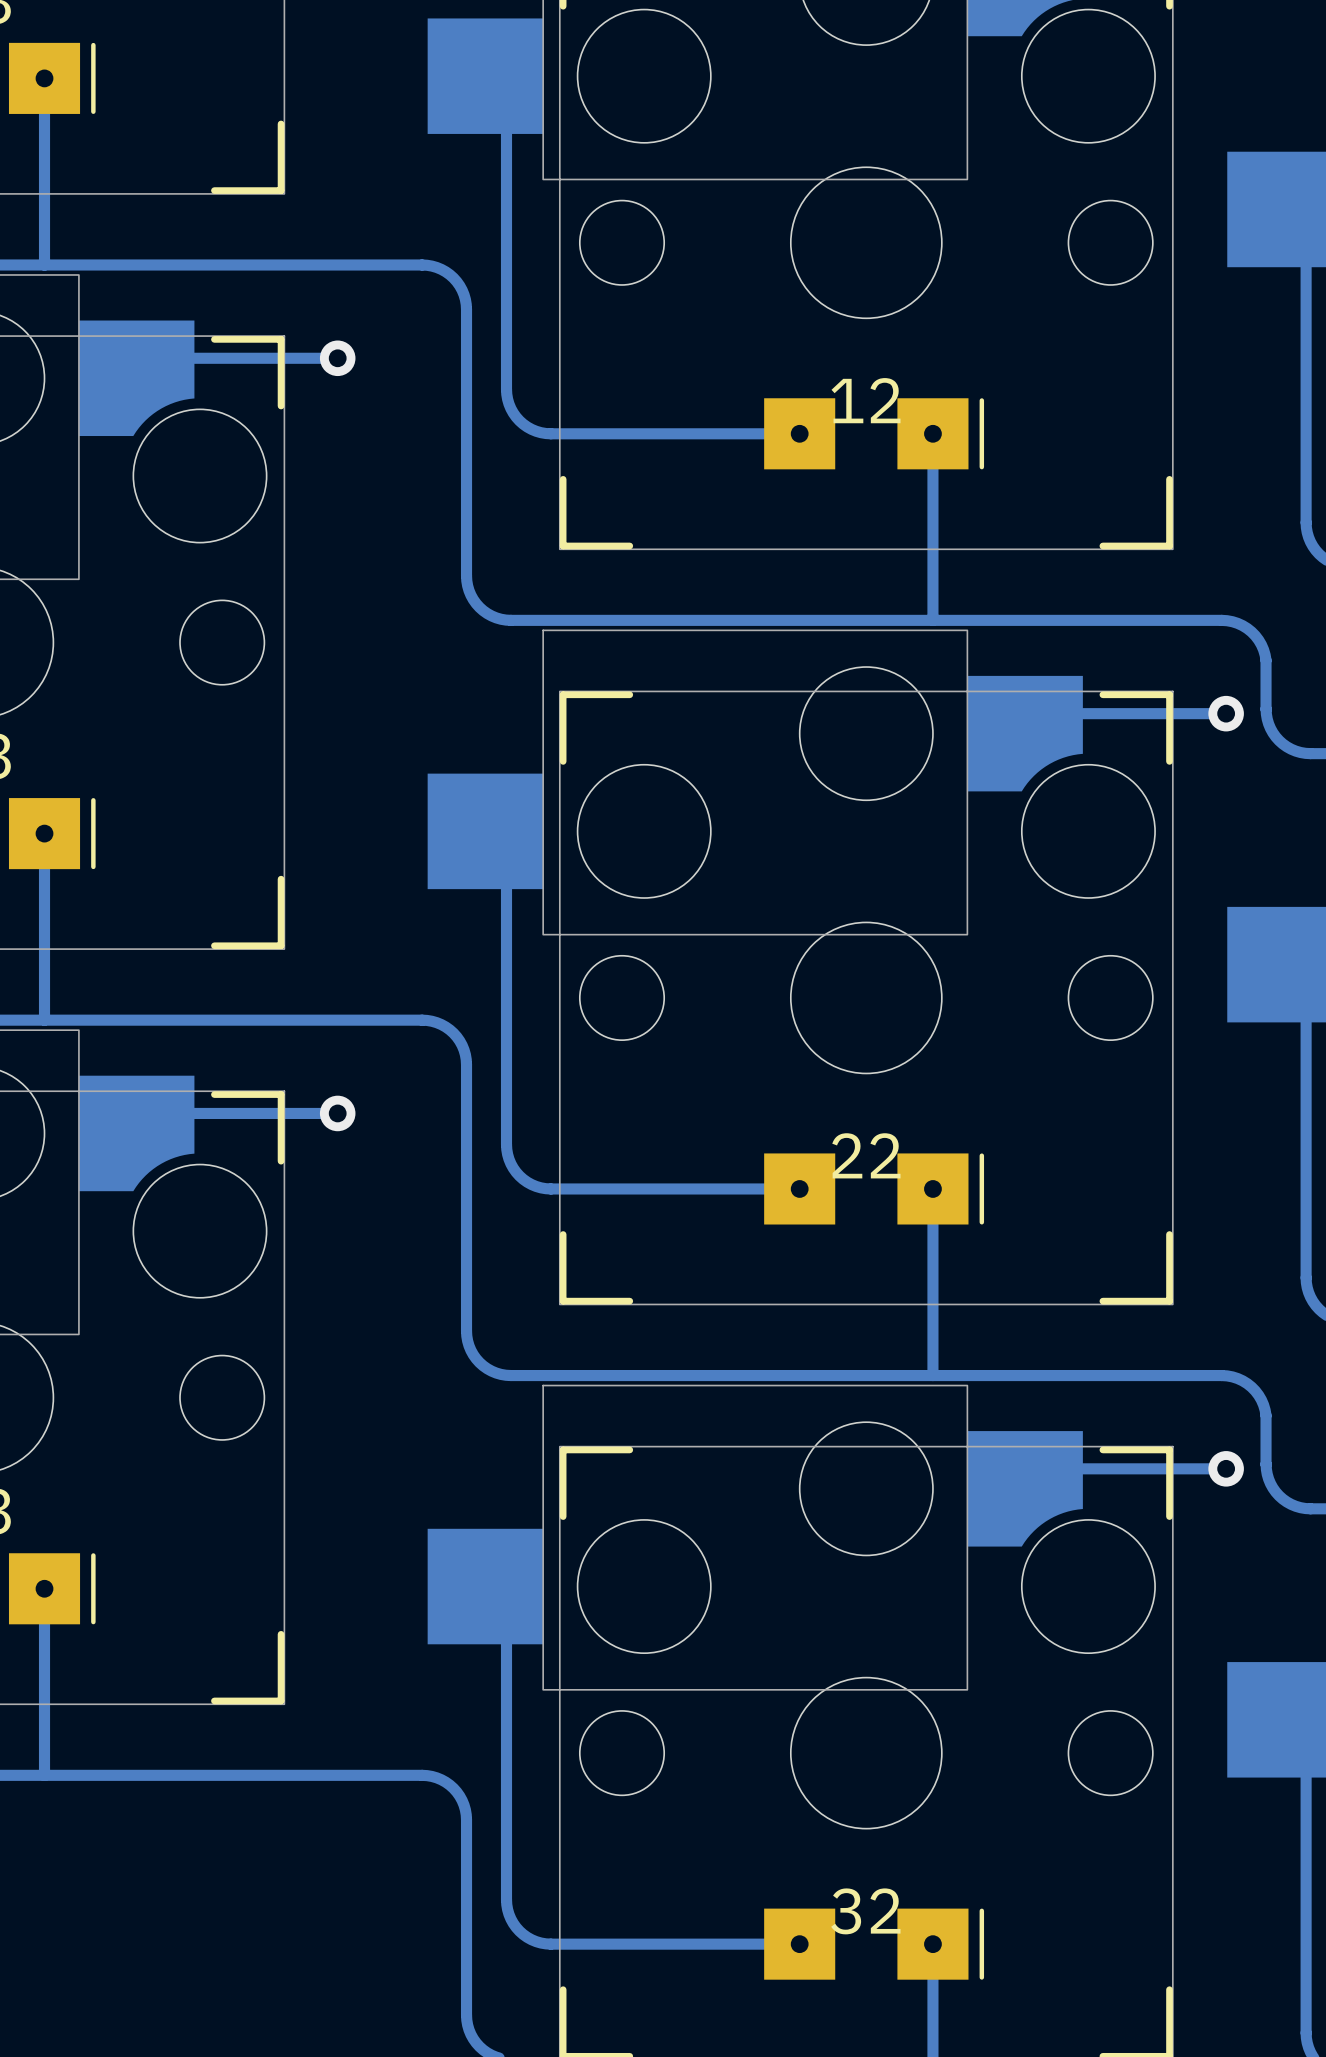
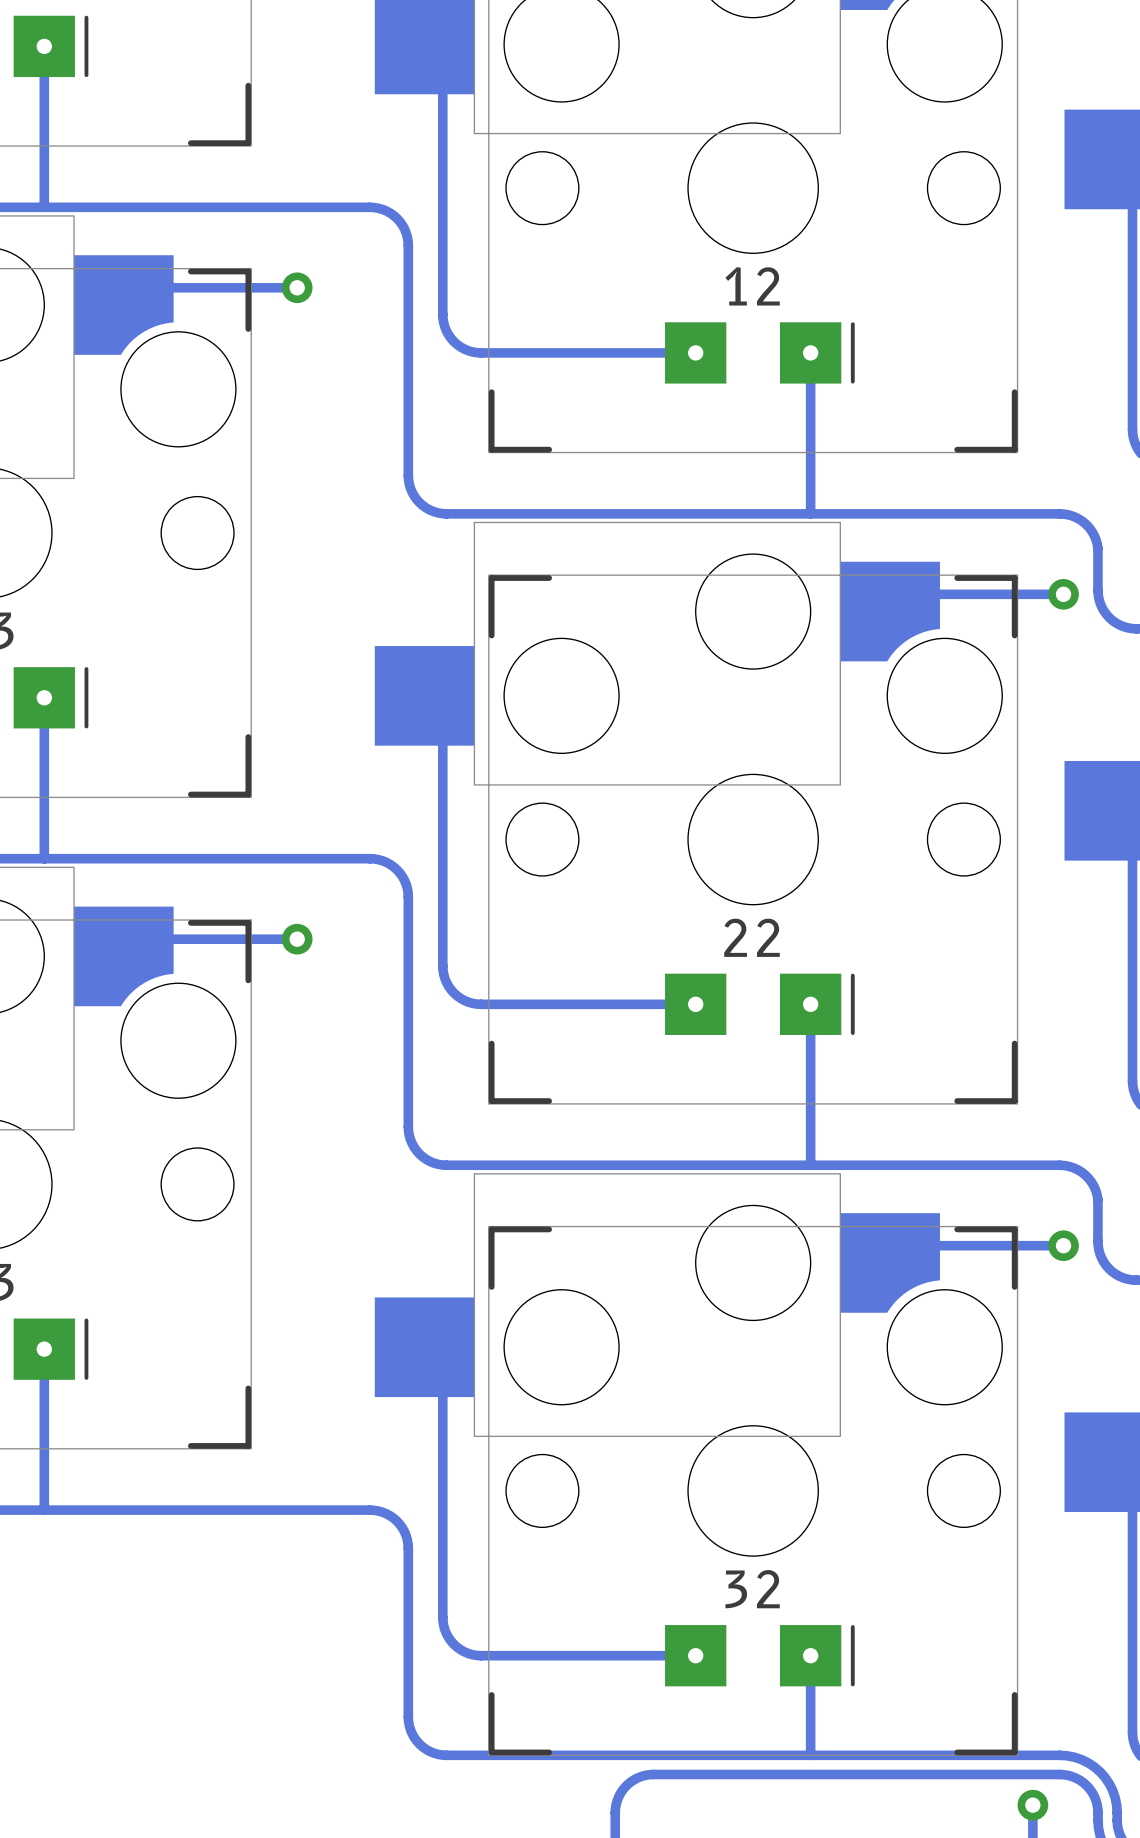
part value position: 12 (866, 400) -> 12 (752, 286)
part value position: 22 (866, 1155) -> 22 (752, 937)
part value position: 32 (865, 1911) -> 32 (752, 1589)

